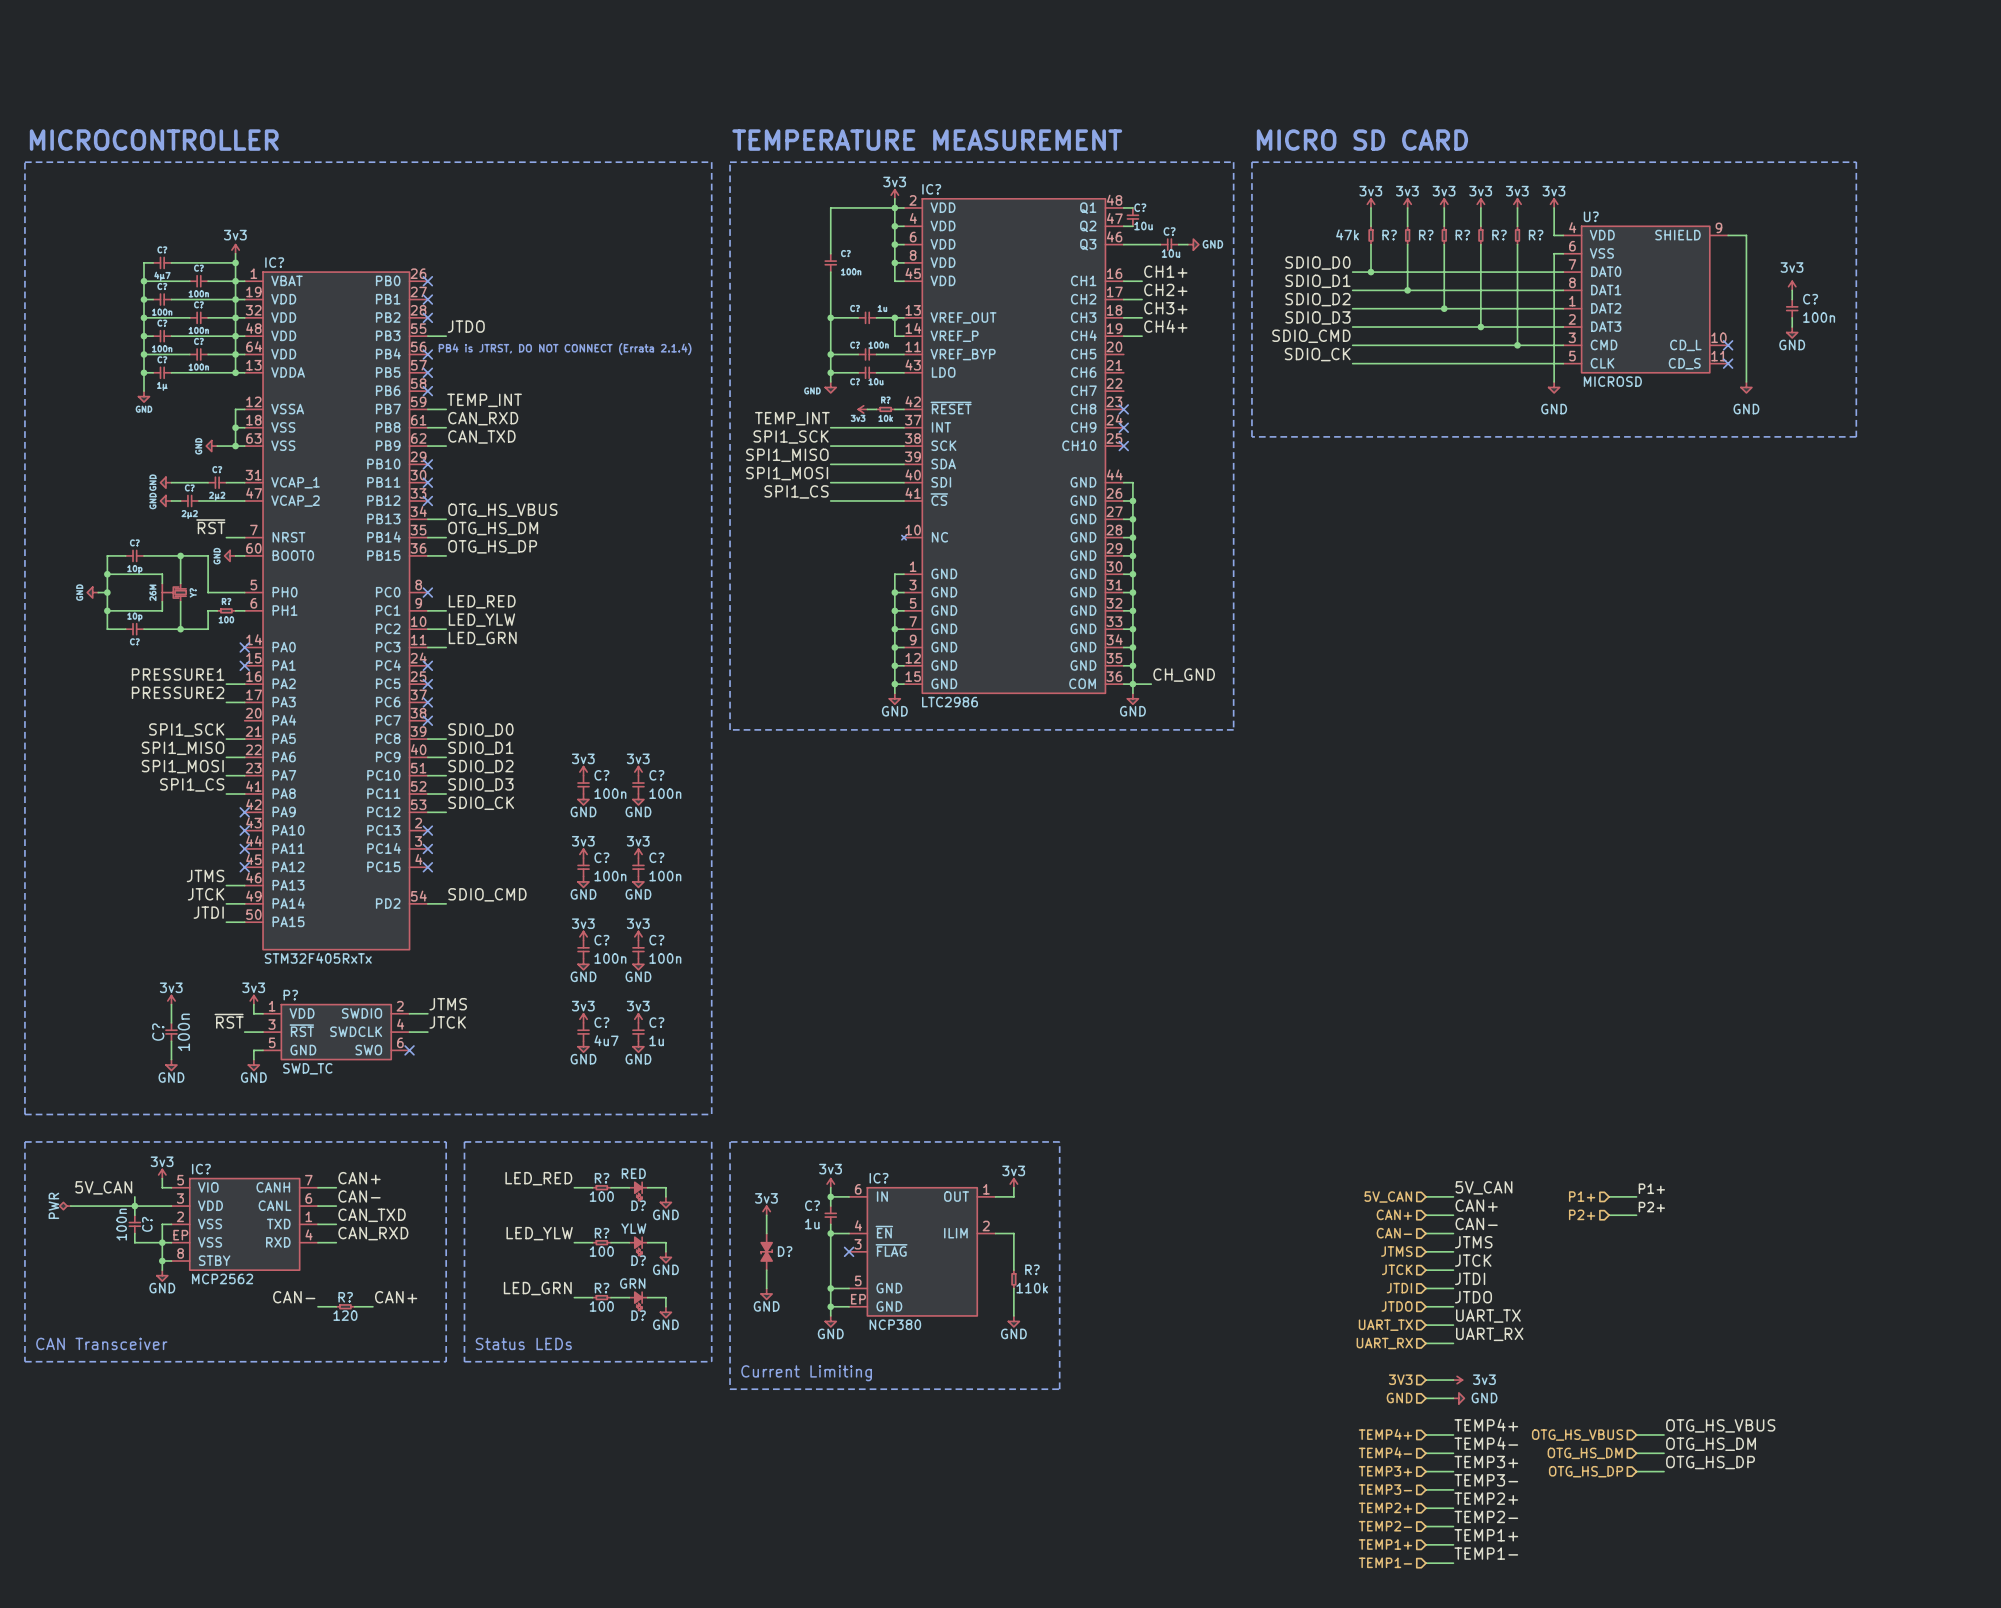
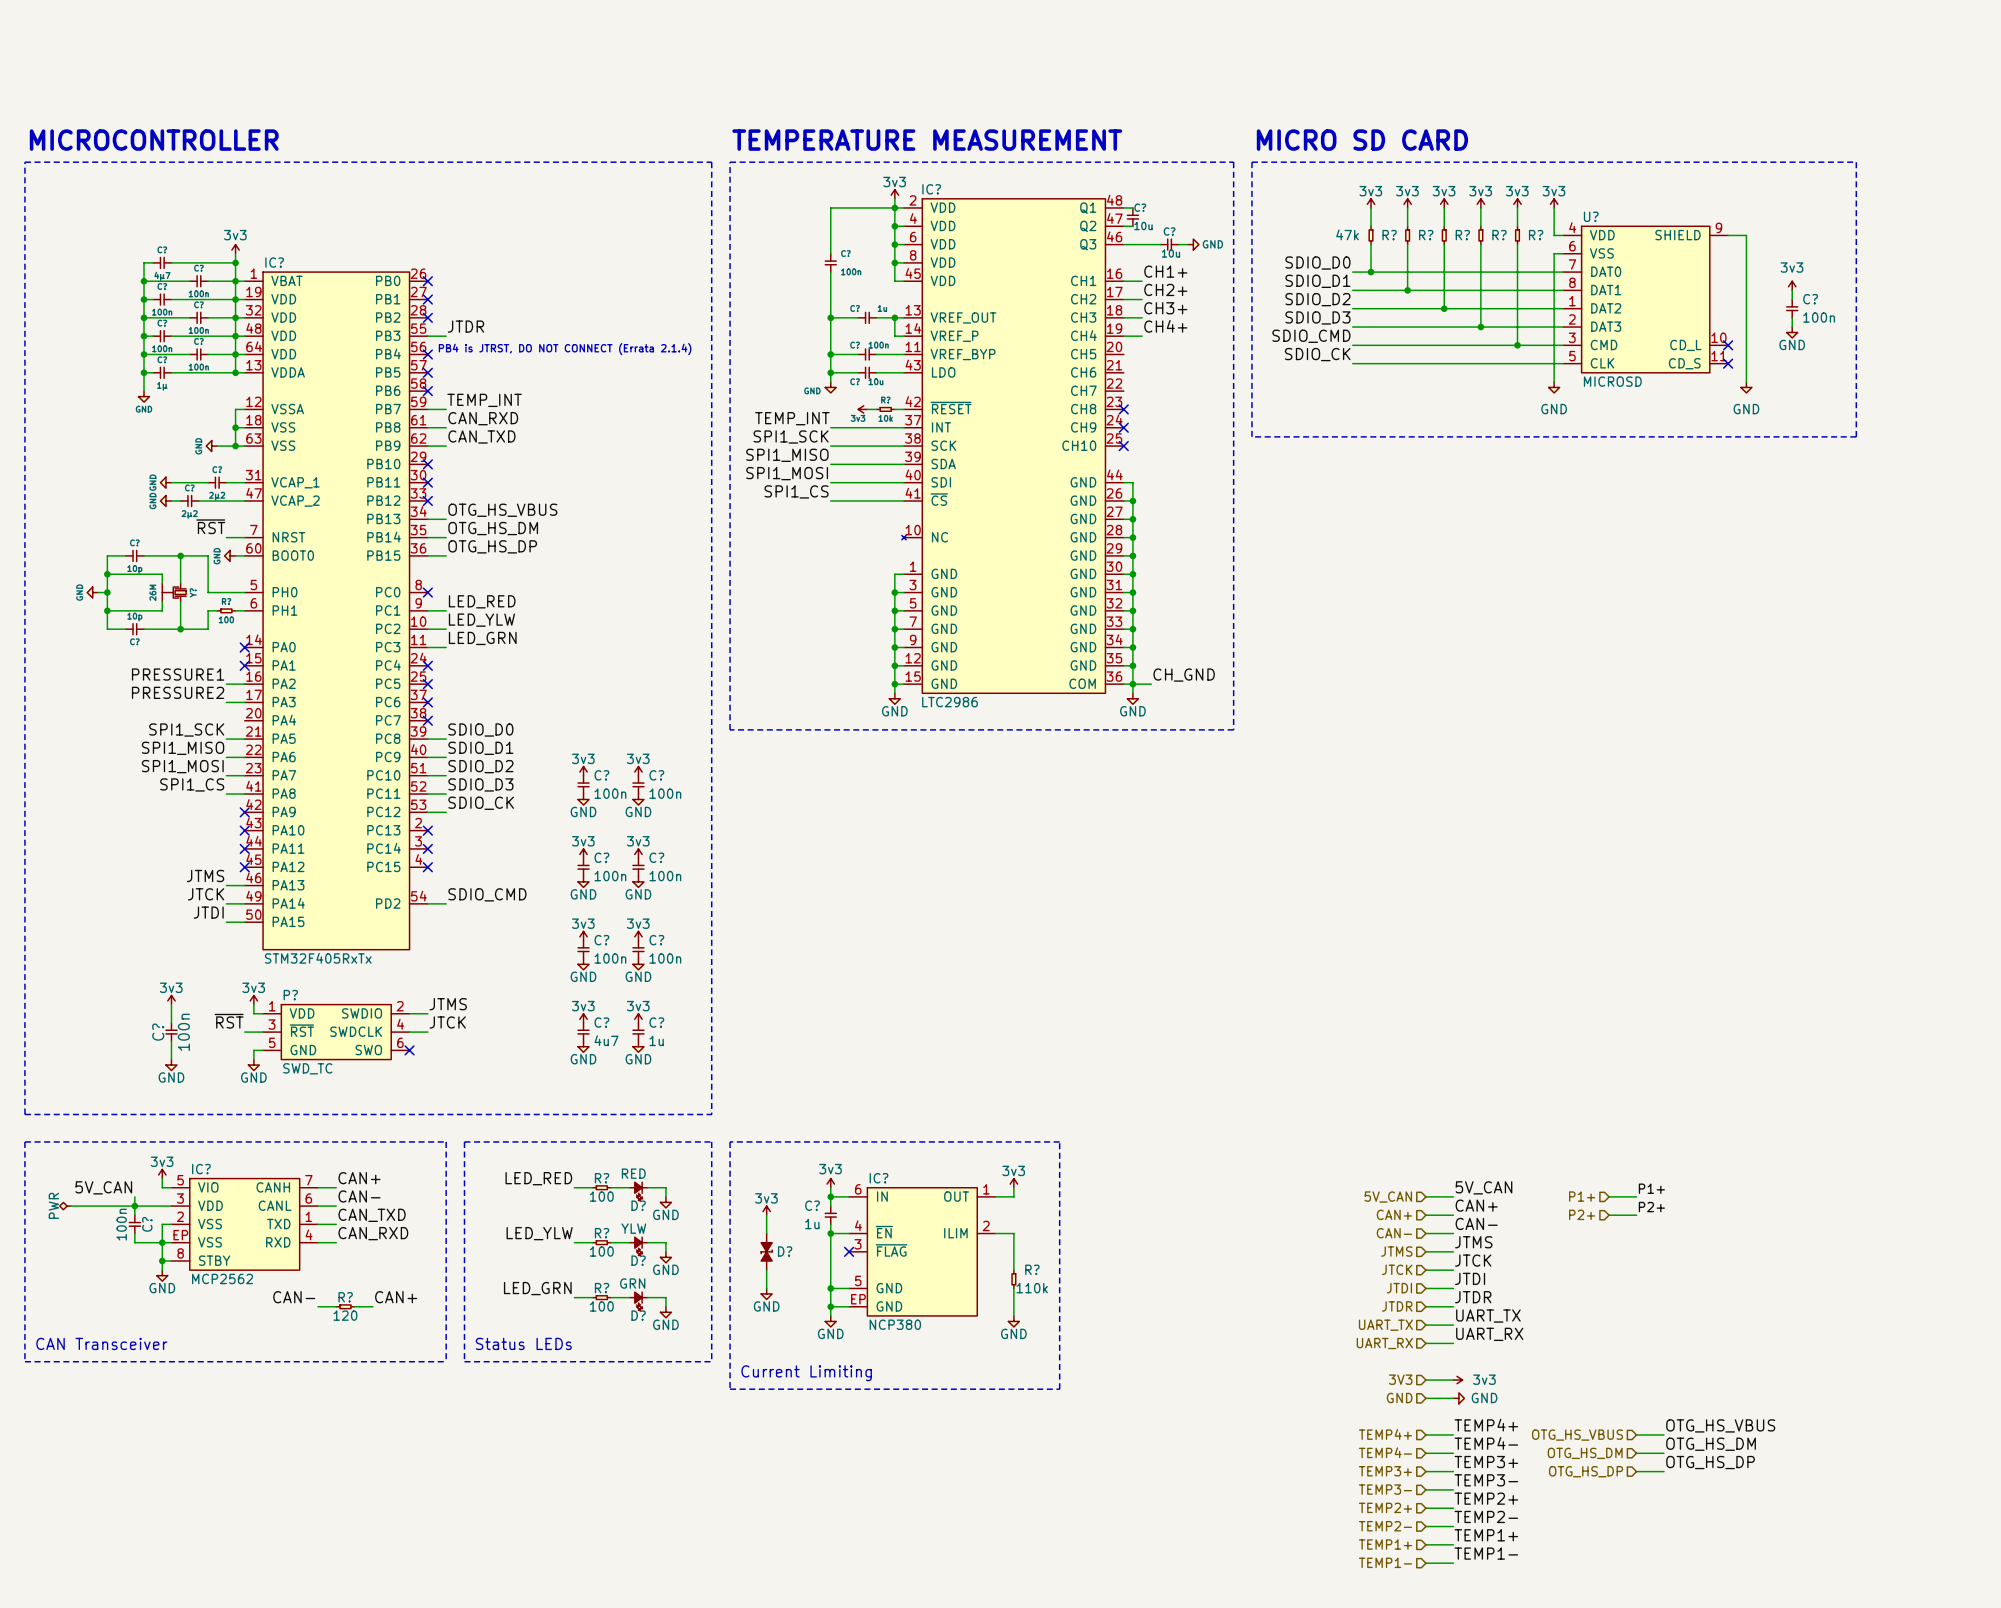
label: JTDO (466, 326) -> JTDR (465, 326)
label: JTDO (1473, 1297) -> JTDR (1473, 1297)
hierarchical label: JTDO (1397, 1306) -> JTDR (1397, 1306)

